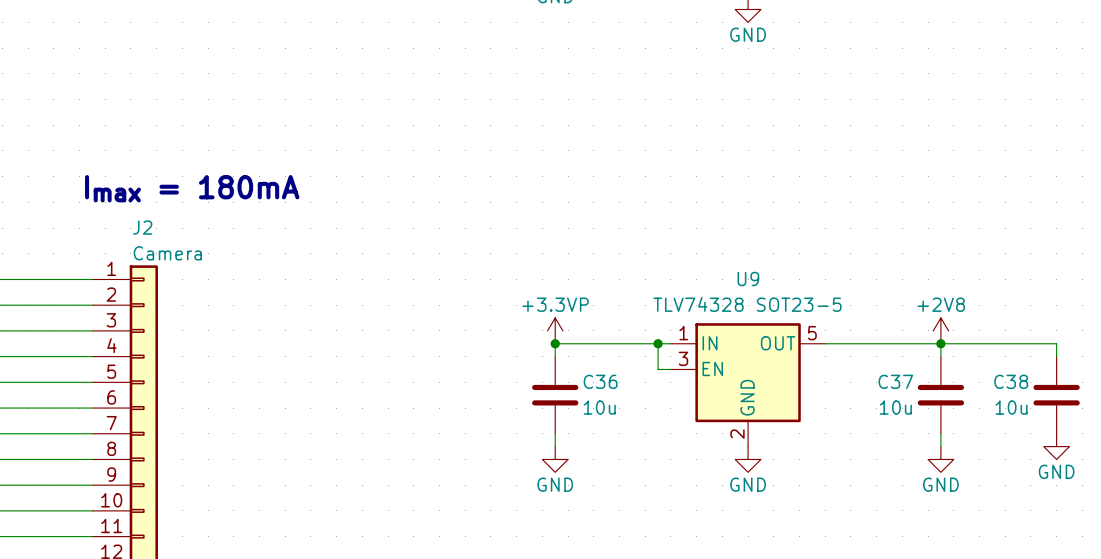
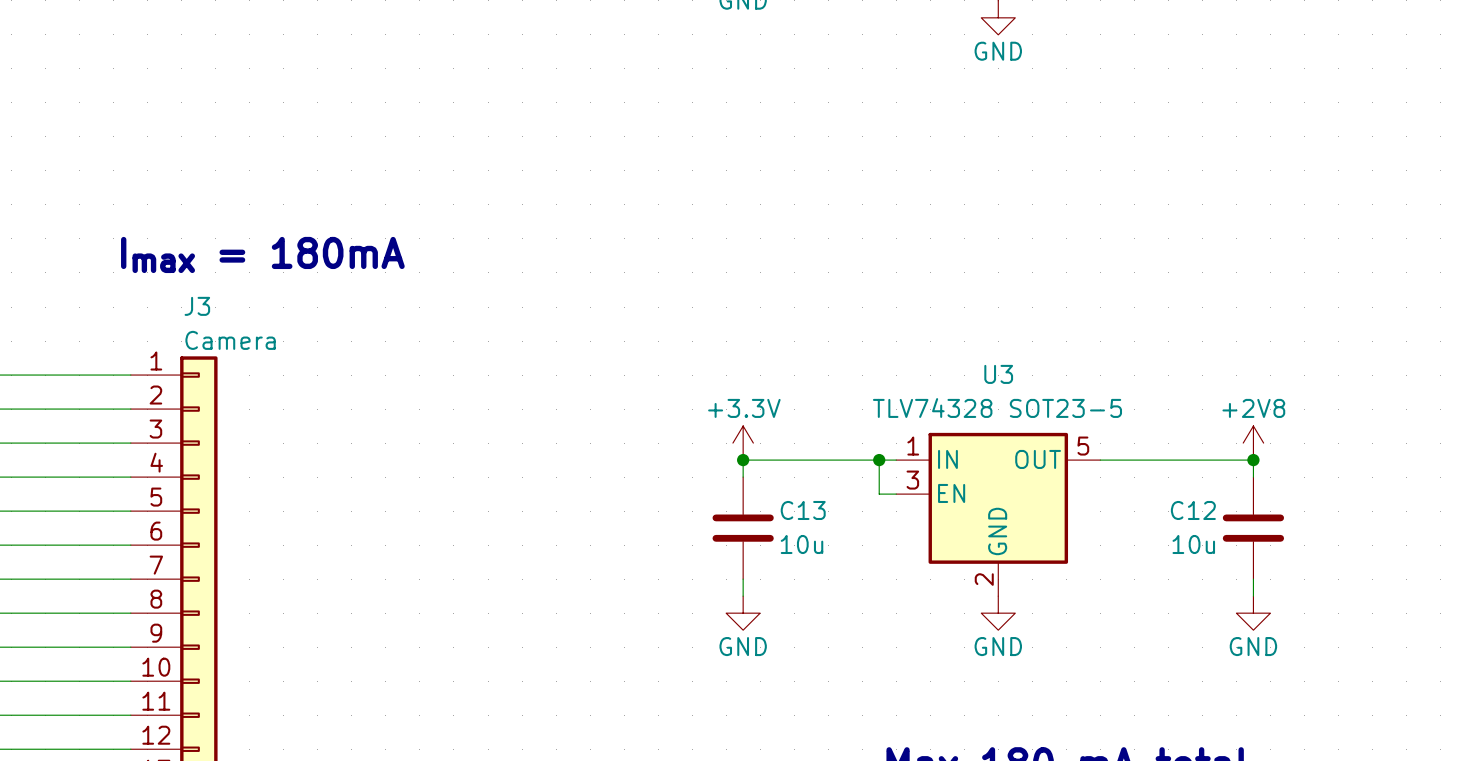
J2 name: J2 (142, 227) -> J3 (197, 306)
U9 name: U9 (748, 279) -> U3 (998, 374)
power symbol: +3.3VP (555, 330) -> +3.3V (743, 443)
wire: (940, 343) (1056, 343) (1056, 356) -> none
C36 name: C36 (600, 381) -> C13 (803, 510)
C37 name: C37 (895, 381) -> C12 (1193, 510)
C38: 10u (1056, 395) -> none
power symbol: GND (1056, 446) -> none

